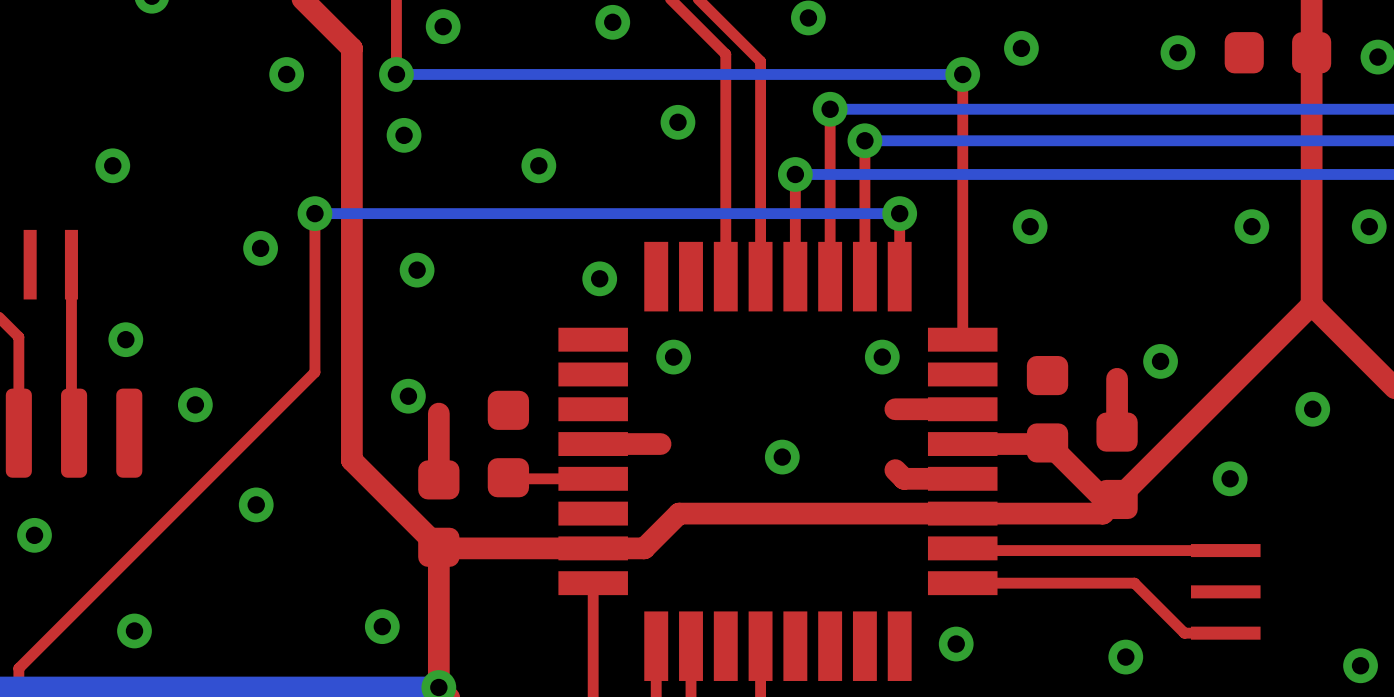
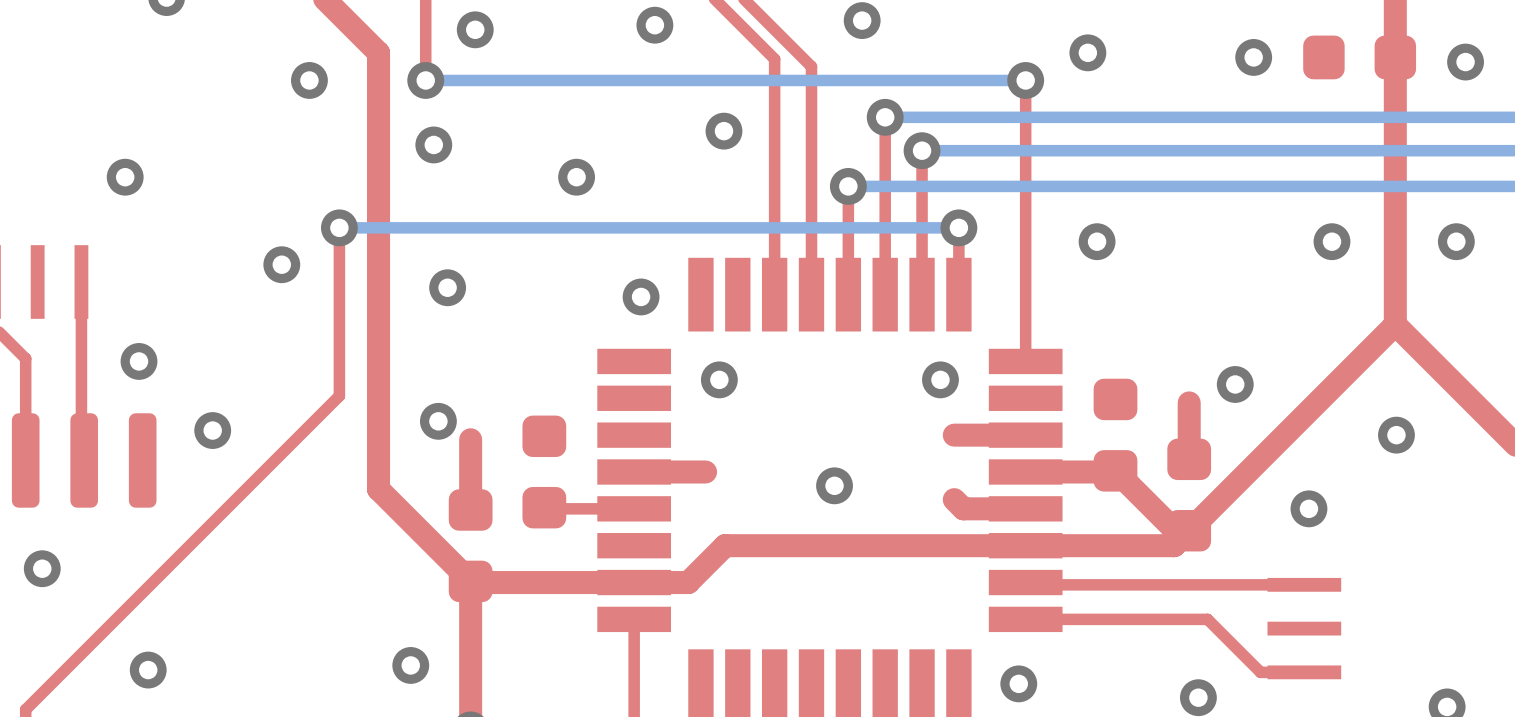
via: (256, 504) -> none

